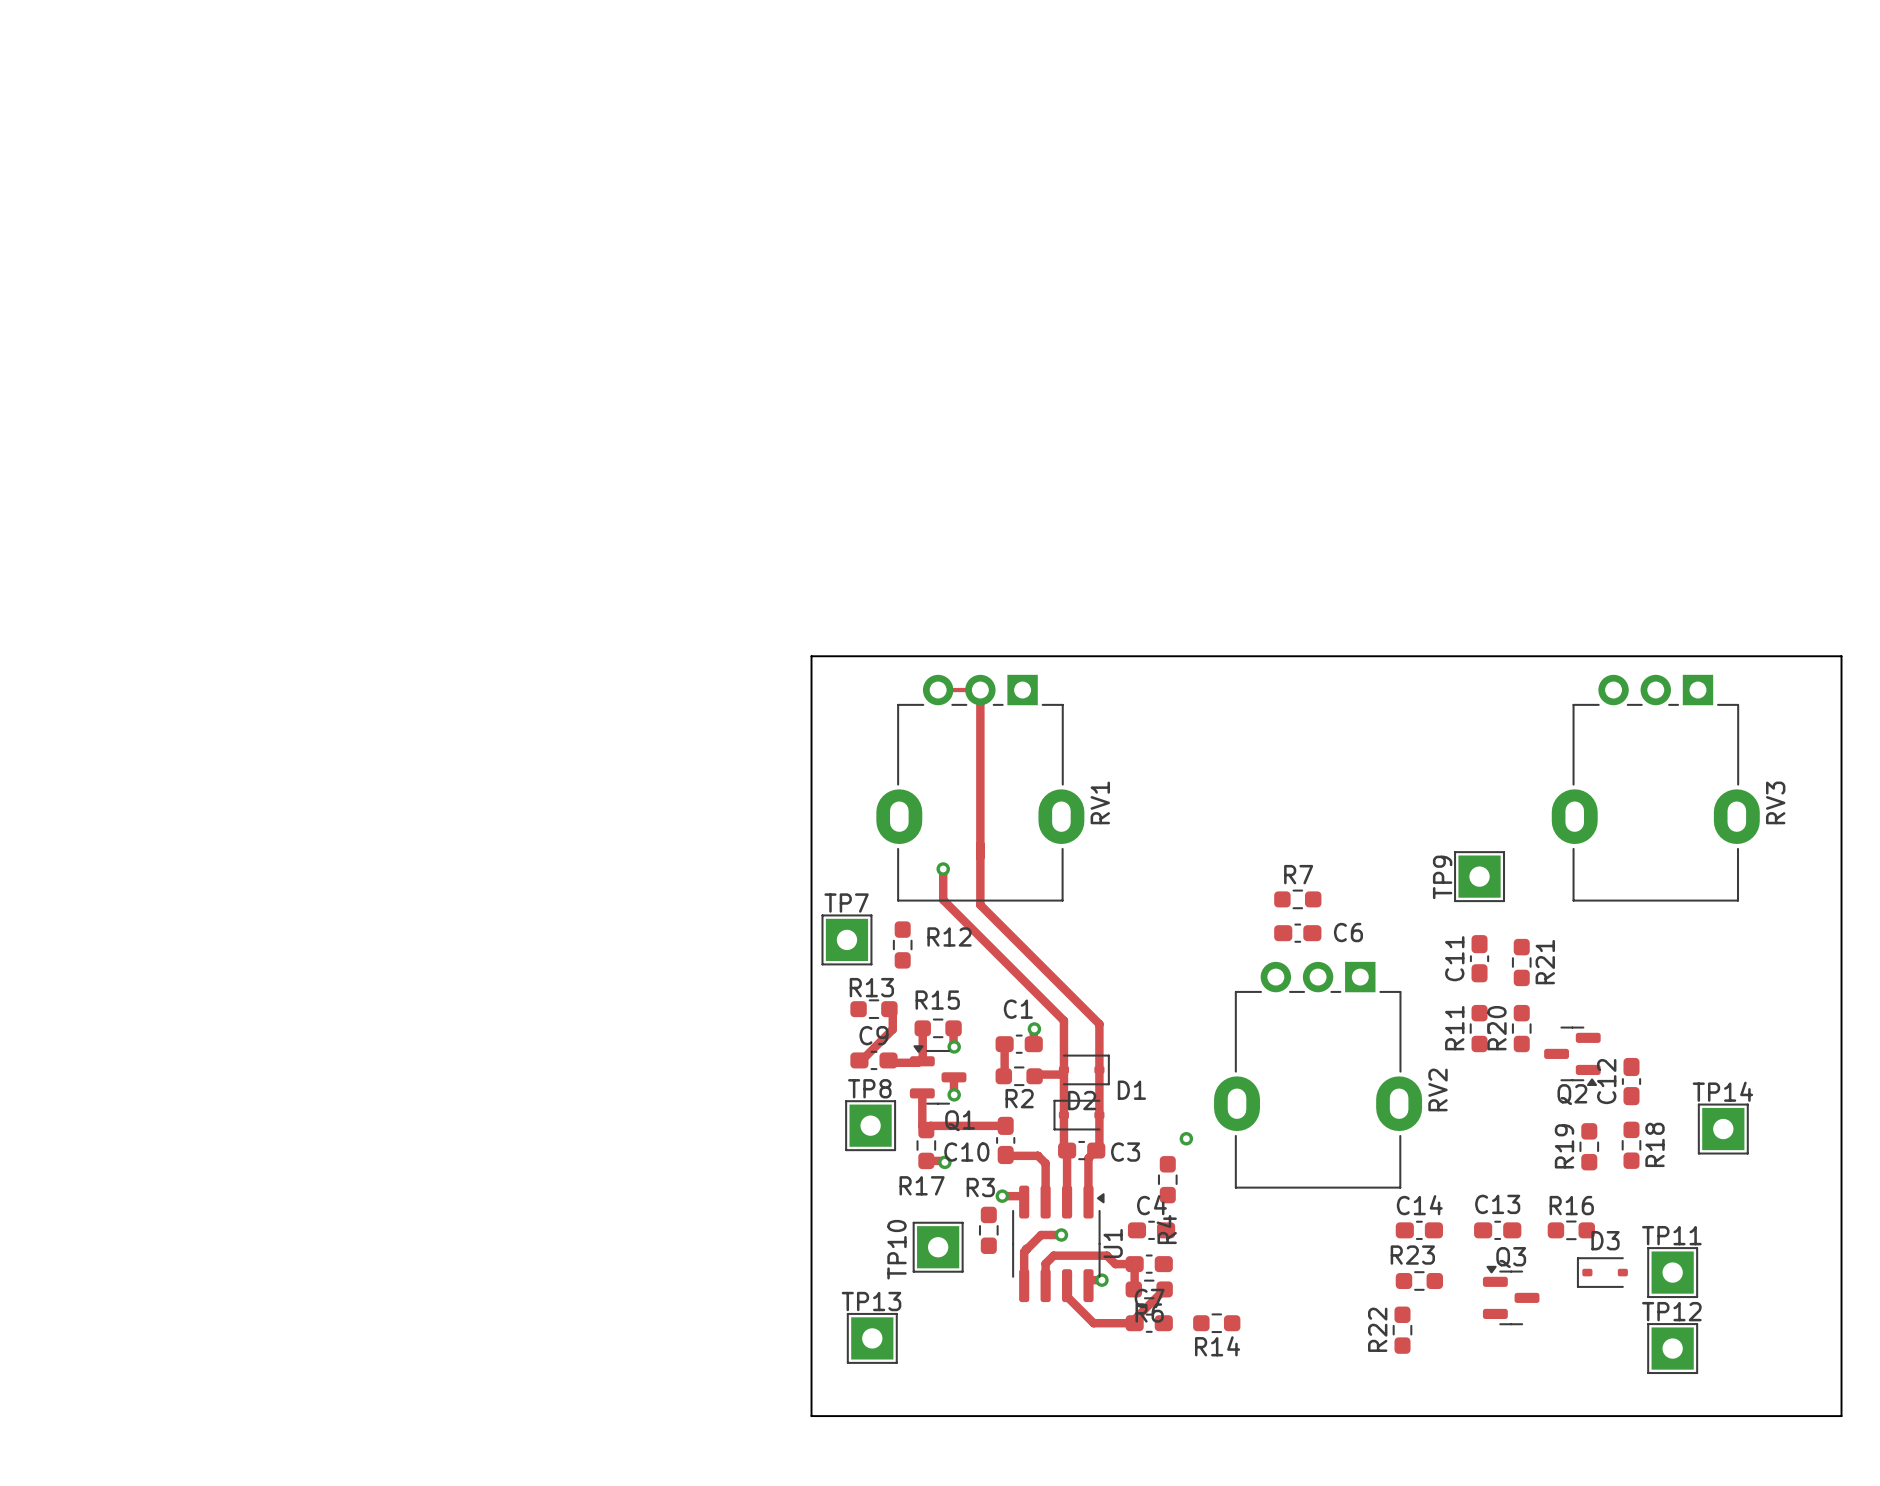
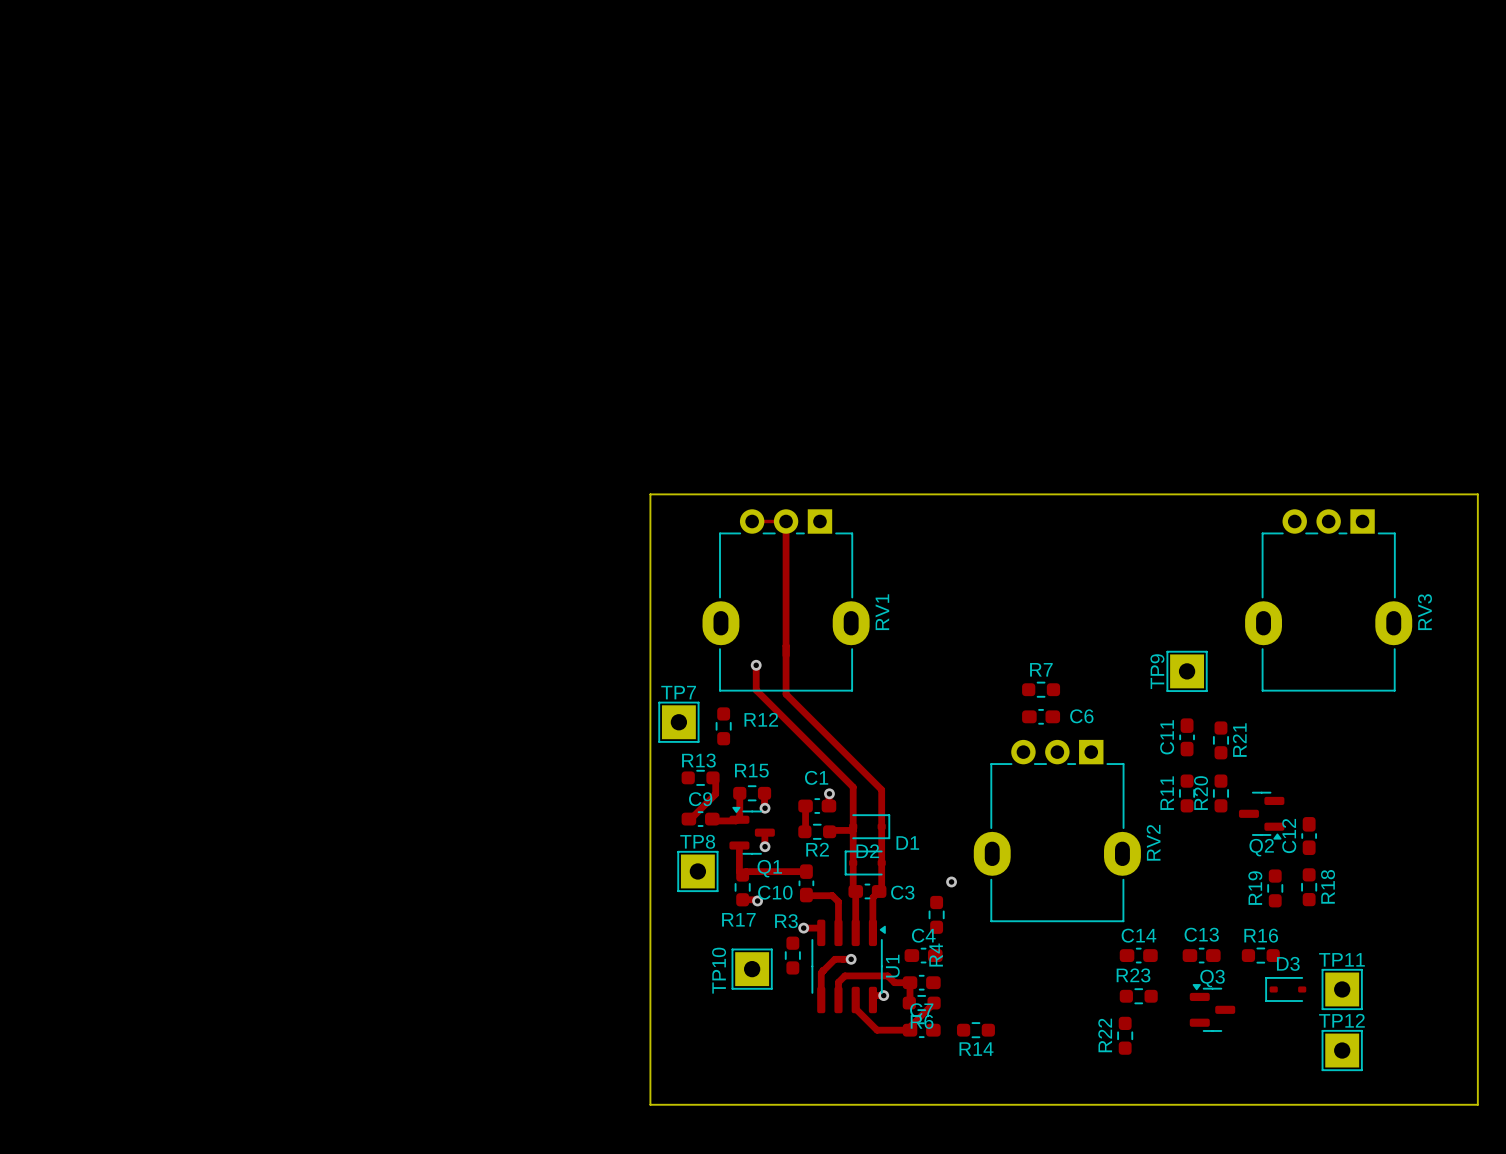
TP14: (1723, 1129) -> none
TP13: (872, 1338) -> none

